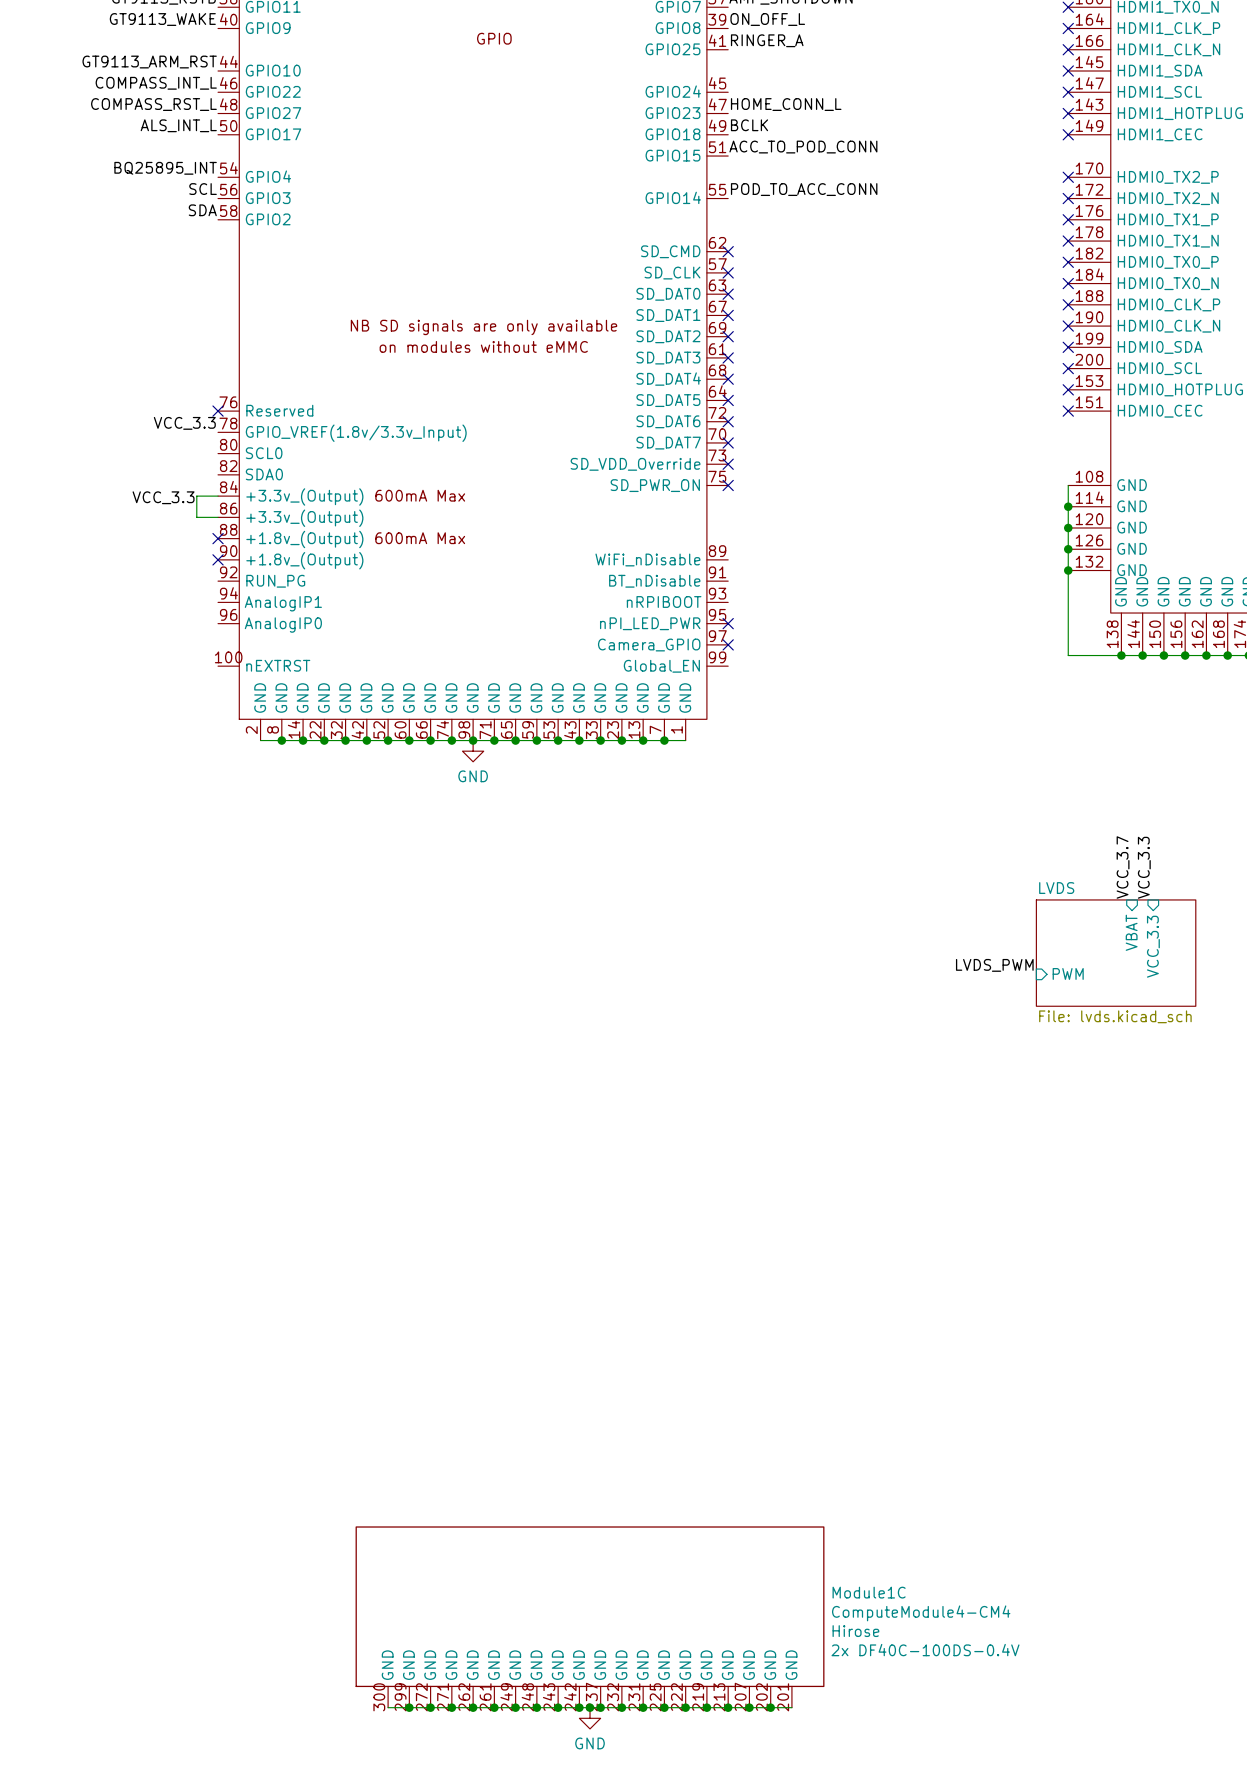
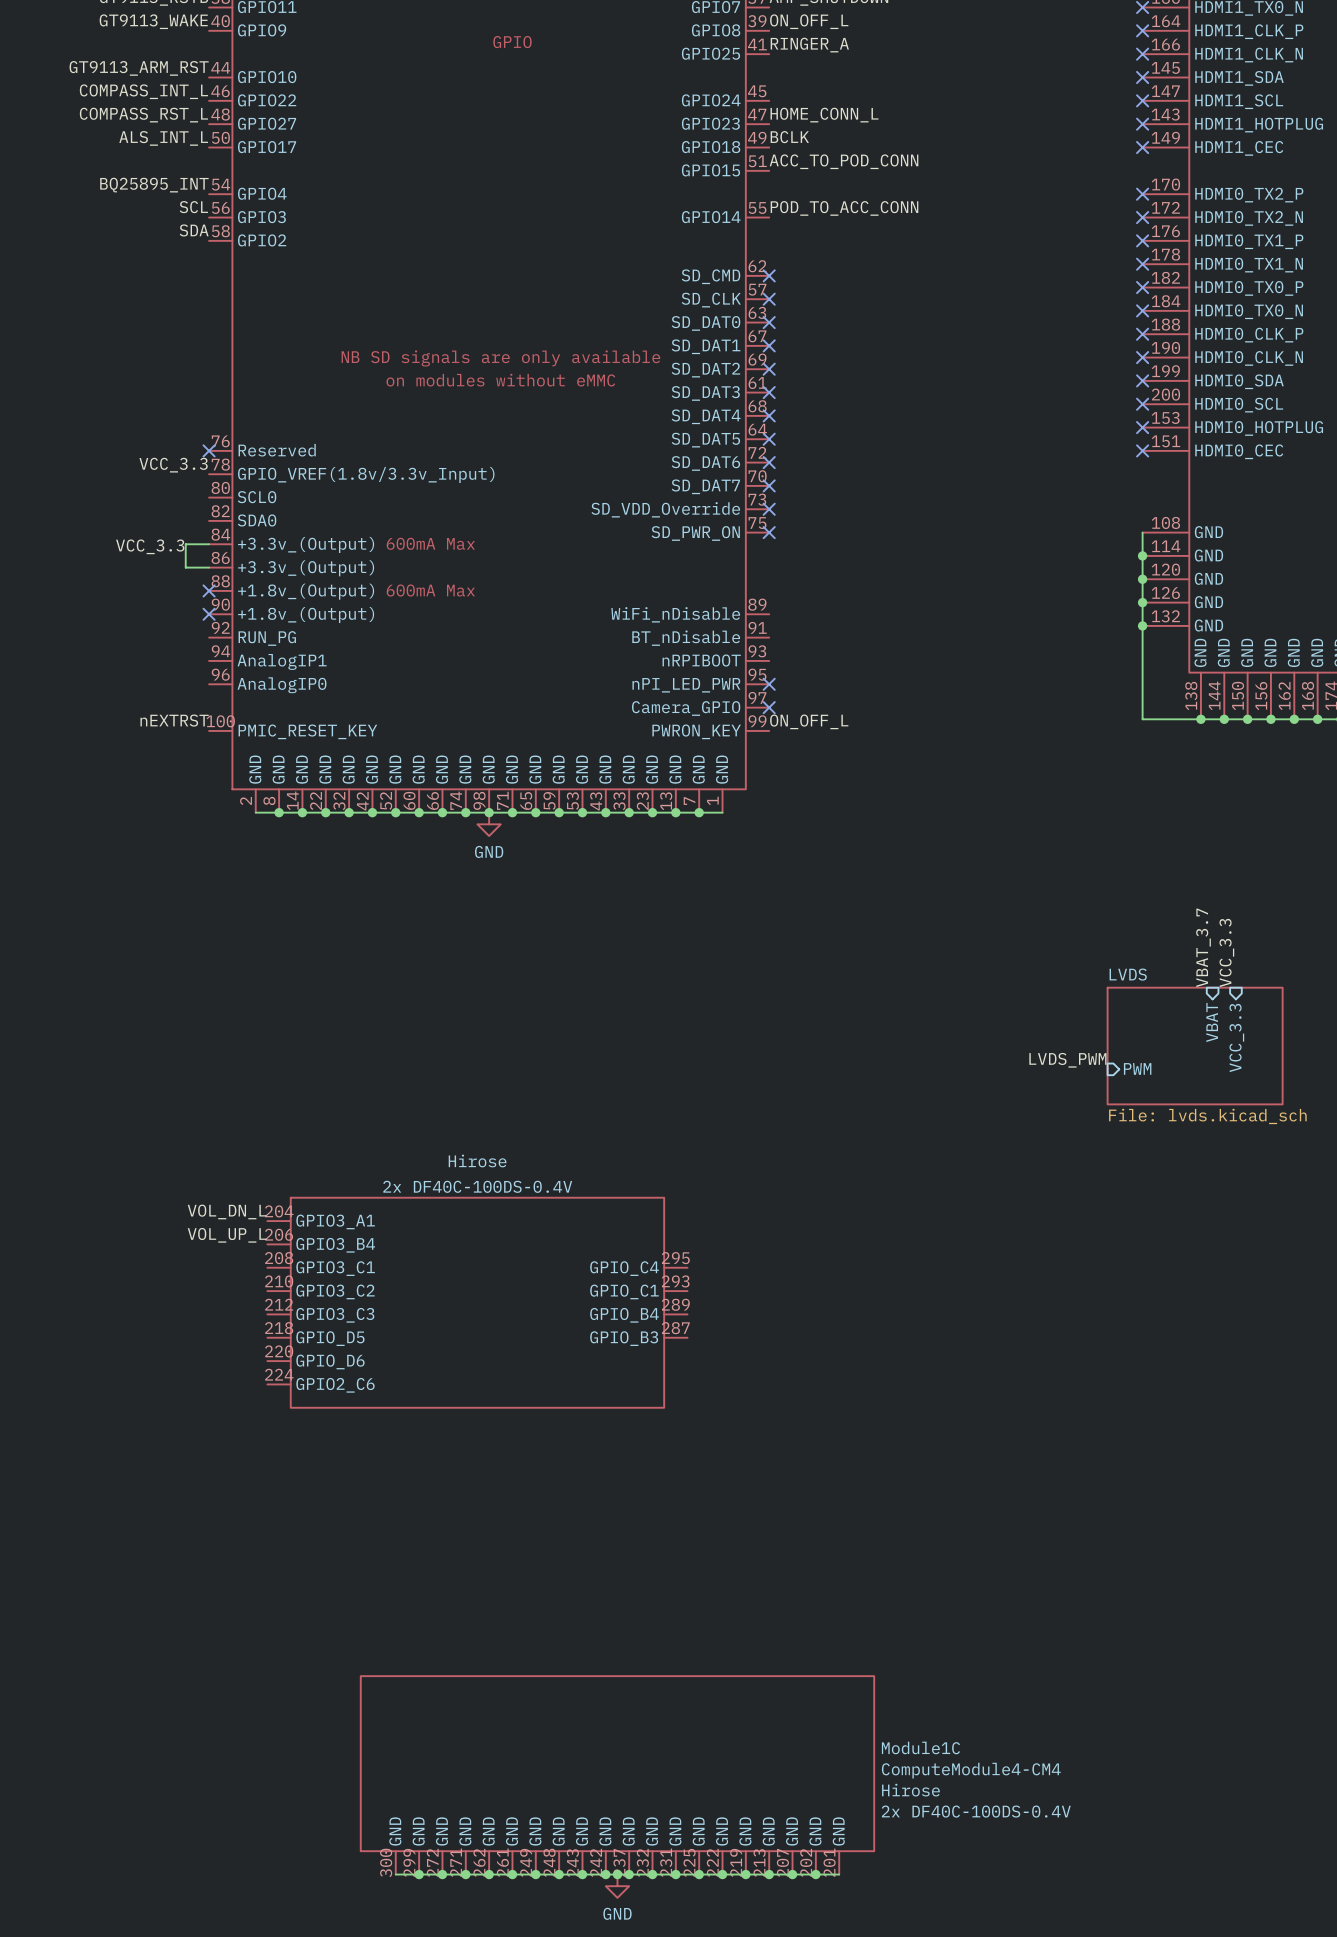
label: none -> nEXTRST (174, 720)
label: none -> ON_OFF_L (809, 721)
part pin name: nEXTRST (278, 665) -> PMIC_RESET_KEY (307, 731)
part pin name: Global_EN (661, 666) -> PWRON_KEY (696, 731)
label: VCC_3.7 (1123, 867) -> VBAT_3.7 (1203, 947)
label: none -> VOL_DN_L (227, 1211)
label: none -> VOL_UP_L (227, 1235)
part: none -> (477, 1302)

